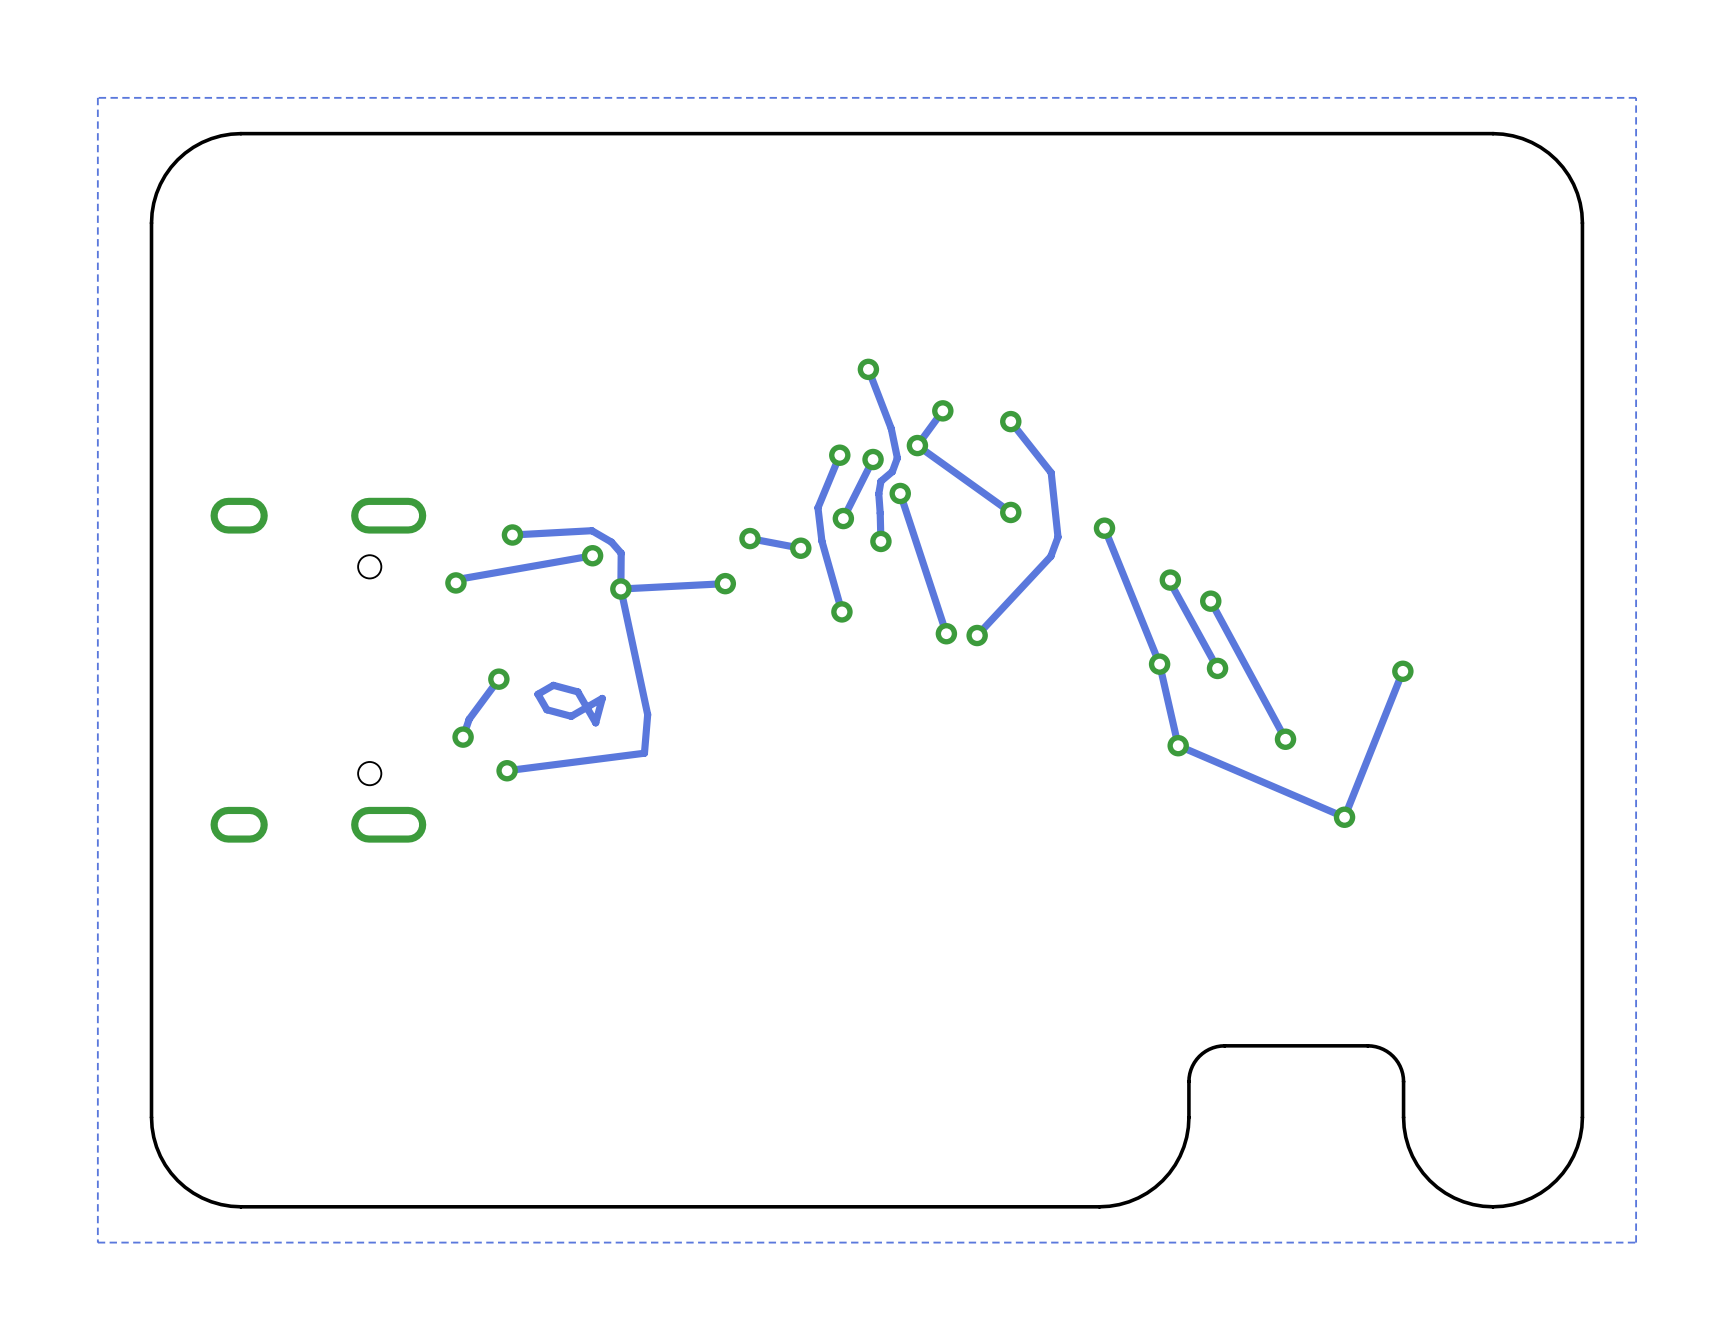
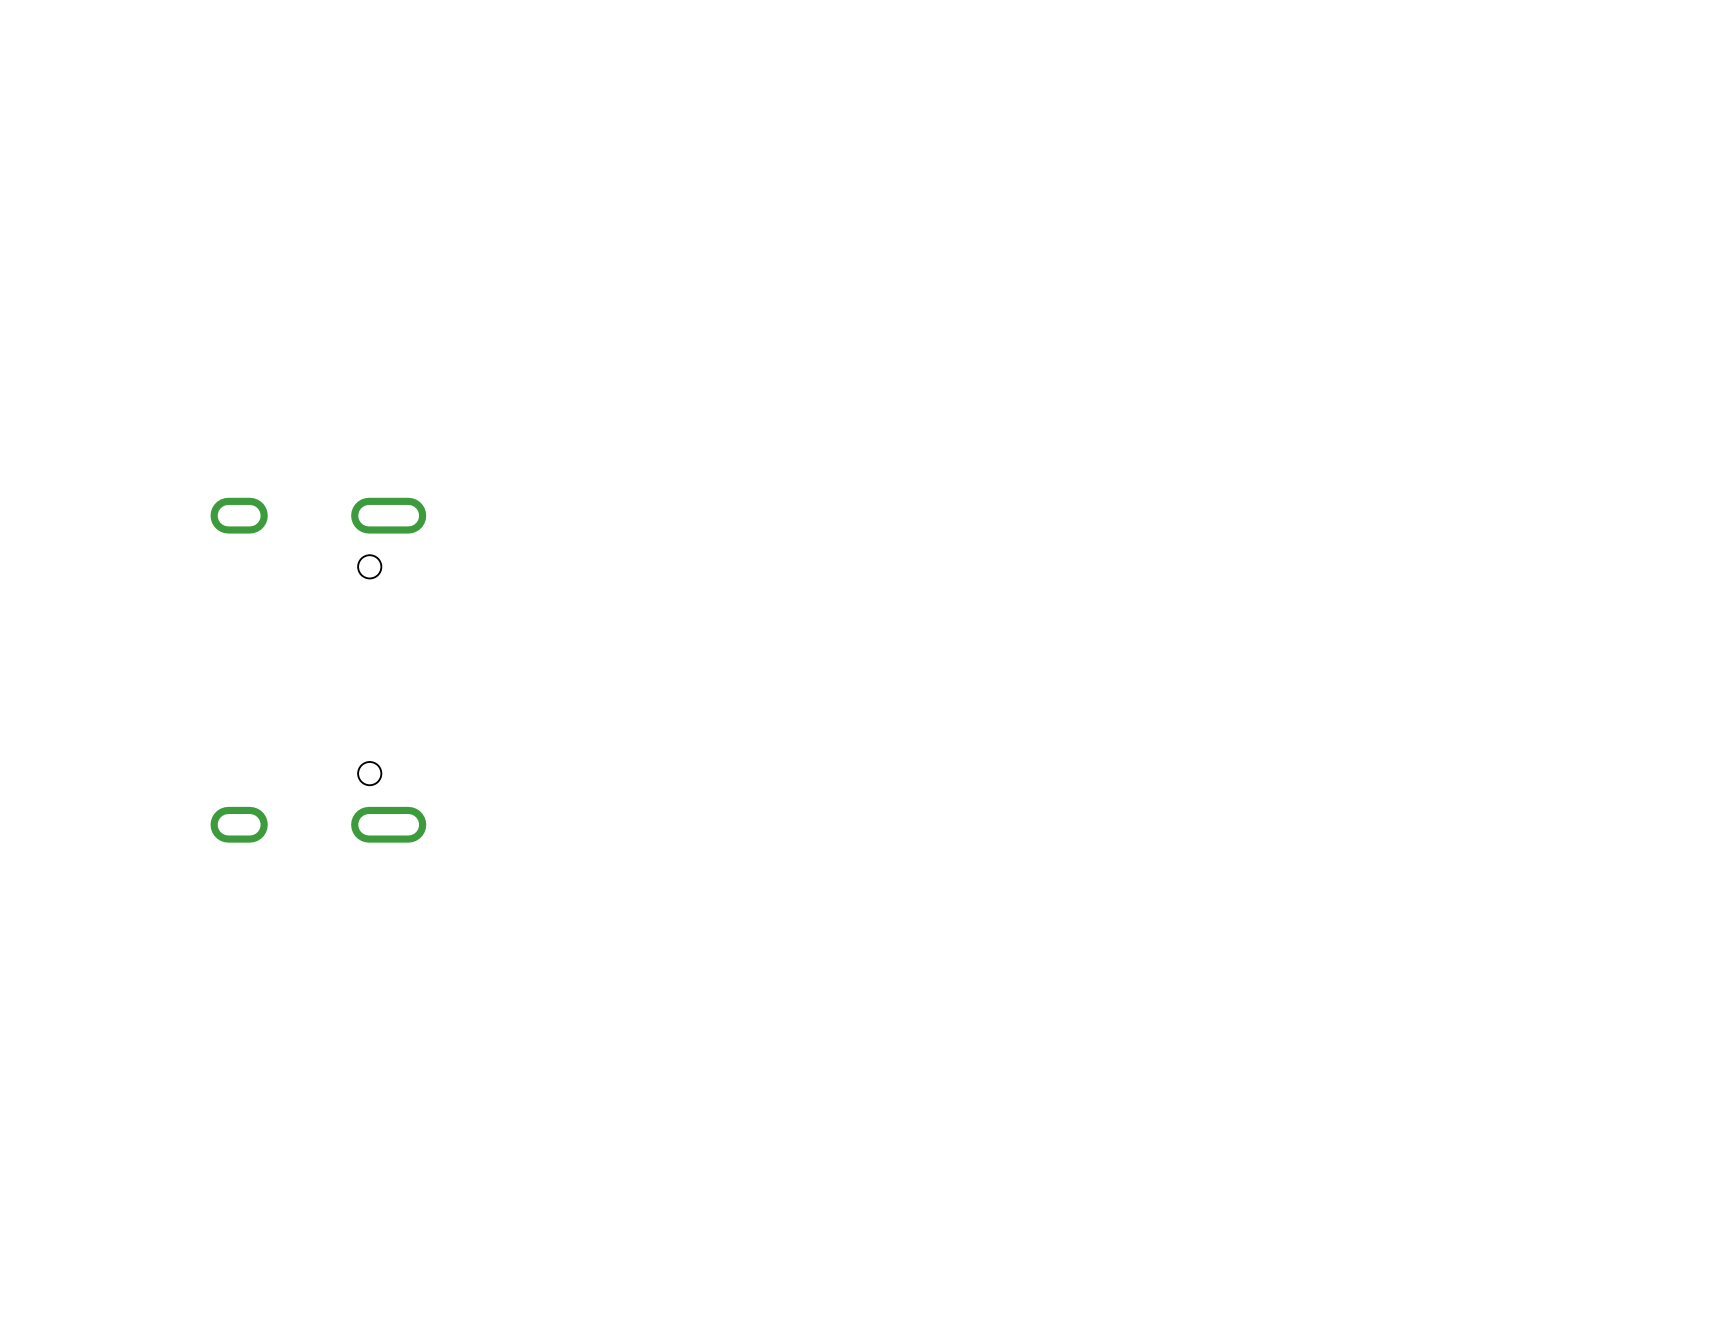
zone outline: (1636, 97) (1636, 1242) (97, 1242) (97, 97) (1636, 97) -> none
board edge: (1493, 133) (240, 133) (211, 138) (185, 153) (171, 167) (160, 184) (153, 203) (151, 223) (151, 1117) (156, 1146) (171, 1173) (185, 1187) (202, 1197) (221, 1204) (240, 1206) (1109, 1206) (1129, 1201) (1147, 1193) (1162, 1180) (1175, 1164) (1183, 1146) (1188, 1127) (1189, 1073) (1196, 1059) (1205, 1051) (1224, 1045) (1367, 1045) (1386, 1051) (1400, 1066) (1403, 1077) (1404, 1127) (1408, 1146) (1417, 1164) (1437, 1187) (1463, 1201) (1493, 1206) (1522, 1201) (1548, 1187) (1562, 1173) (1573, 1156) (1580, 1137) (1582, 1117) (1582, 223) (1580, 203) (1573, 184) (1556, 159) (1531, 142) (1512, 135) (1493, 133) -> none
track: (868, 369) (891, 428) (897, 458) (892, 471) (880, 481) (878, 493) (880, 541) -> none
via: (868, 369) -> none
track: (942, 410) (917, 445) (1010, 512) -> none
via: (942, 410) -> none
track: (1010, 421) (1051, 472) (1058, 537) (1050, 556) (977, 635) -> none
via: (1010, 421) -> none
via: (917, 445) -> none
track: (839, 455) (817, 507) (821, 541) (841, 611) -> none
via: (839, 455) -> none
track: (873, 459) (843, 518) -> none
via: (873, 459) -> none
track: (900, 493) (946, 633) -> none
via: (900, 493) -> none
via: (1010, 512) -> none
via: (843, 518) -> none
track: (1104, 528) (1159, 664) (1178, 745) (1344, 817) (1402, 671) -> none
via: (1104, 528) -> none
track: (512, 535) (591, 530) (611, 542) (621, 553) (620, 589) -> none
via: (512, 535) -> none
track: (749, 538) (800, 548) -> none
via: (749, 538) -> none
via: (880, 541) -> none
via: (800, 548) -> none
track: (592, 555) (455, 579) (455, 582) -> none
via: (592, 555) -> none
track: (1170, 580) (1217, 668) -> none
via: (1170, 580) -> none
via: (455, 582) -> none
track: (725, 583) (620, 589) -> none
via: (725, 583) -> none
track: (620, 589) (647, 714) (644, 753) (507, 770) -> none
via: (620, 589) -> none
track: (1210, 601) (1285, 739) -> none
via: (1210, 601) -> none
via: (841, 611) -> none
via: (946, 633) -> none
via: (977, 635) -> none
via: (1159, 664) -> none
via: (1217, 668) -> none
via: (1402, 671) -> none
track: (498, 679) (469, 719) (463, 737) -> none
via: (498, 679) -> none
track: (553, 685) (537, 694) (546, 709) (571, 716) (602, 698) (595, 722) (577, 691) (553, 685) -> none
via: (463, 737) -> none
via: (1285, 739) -> none
via: (1178, 745) -> none
via: (507, 770) -> none
via: (1344, 817) -> none

